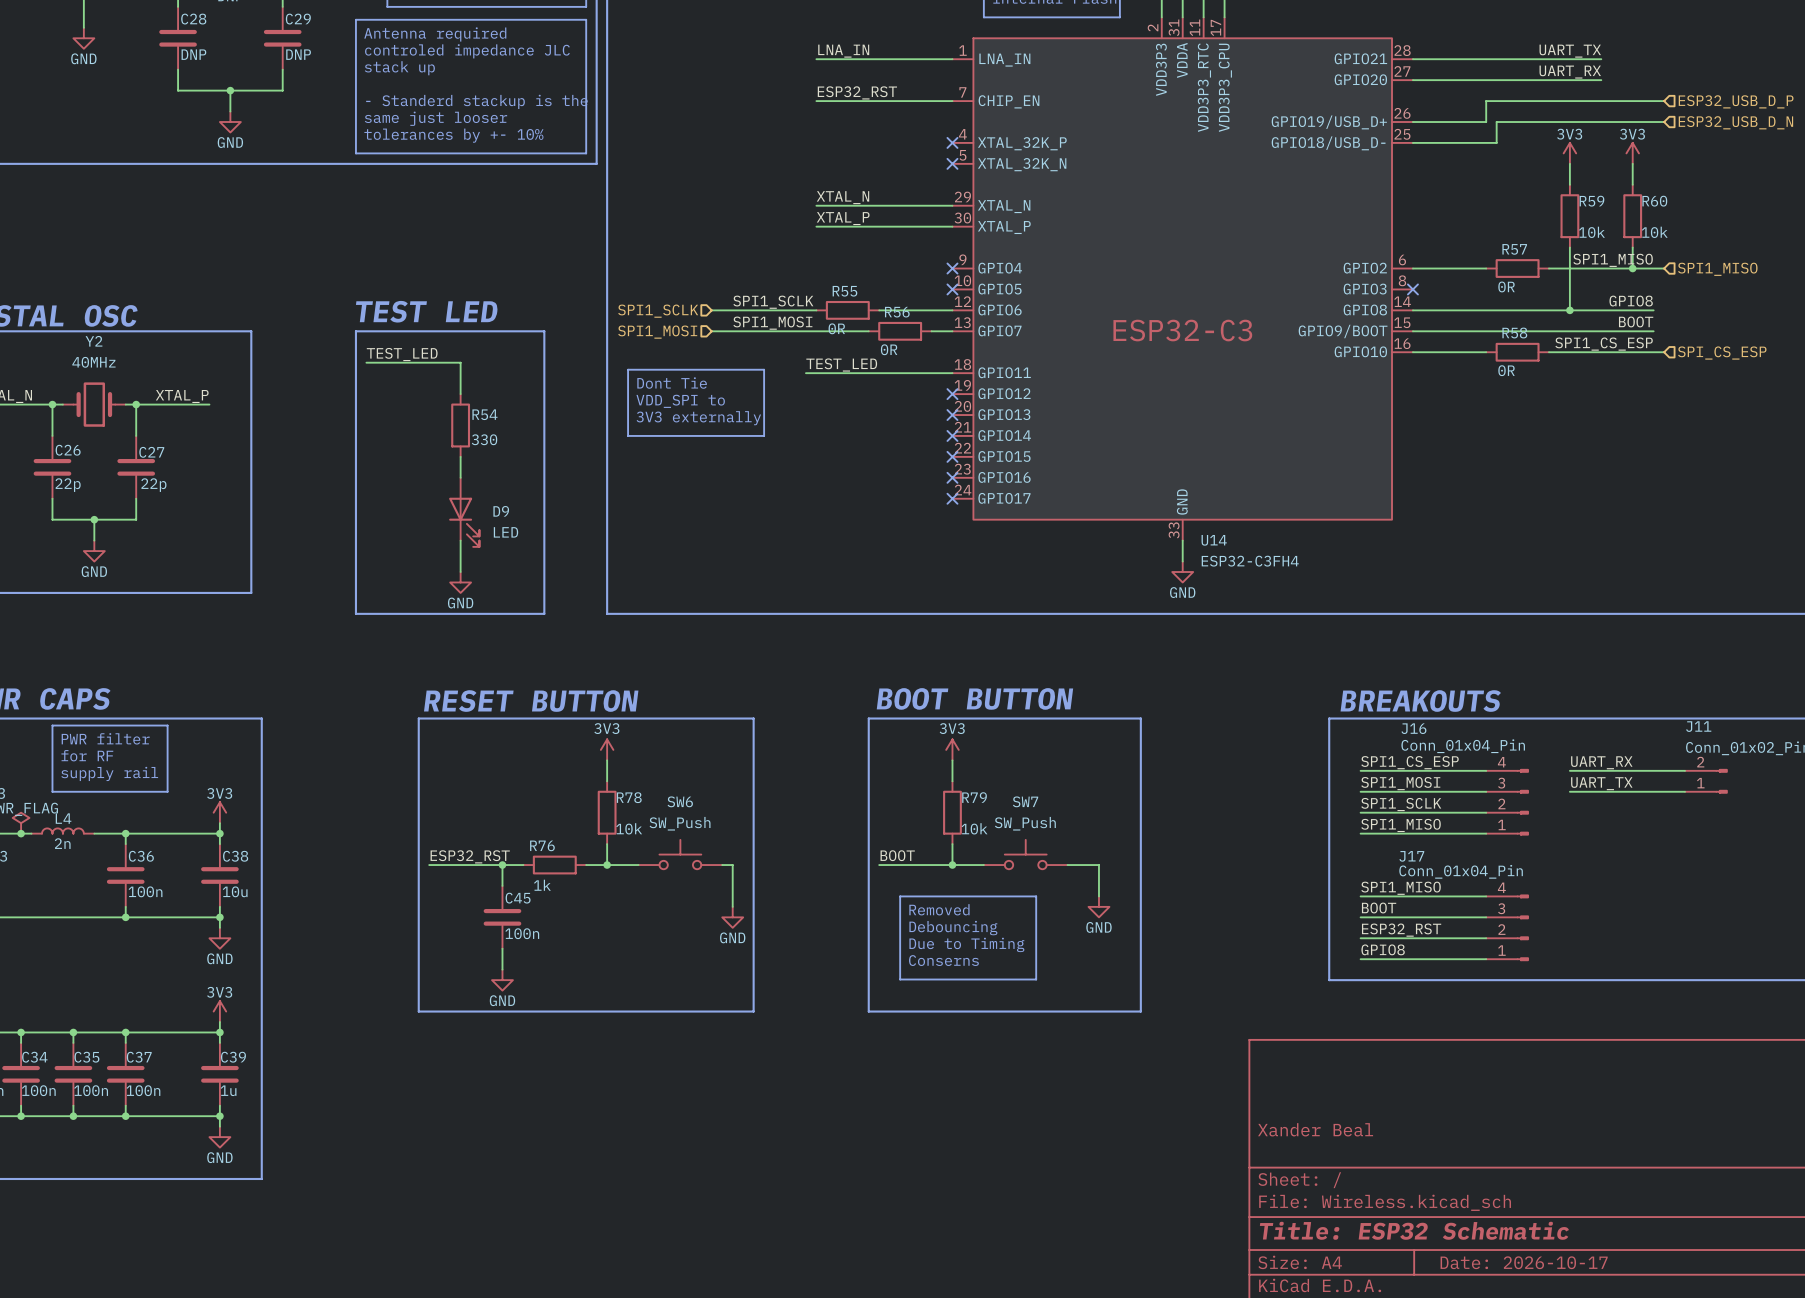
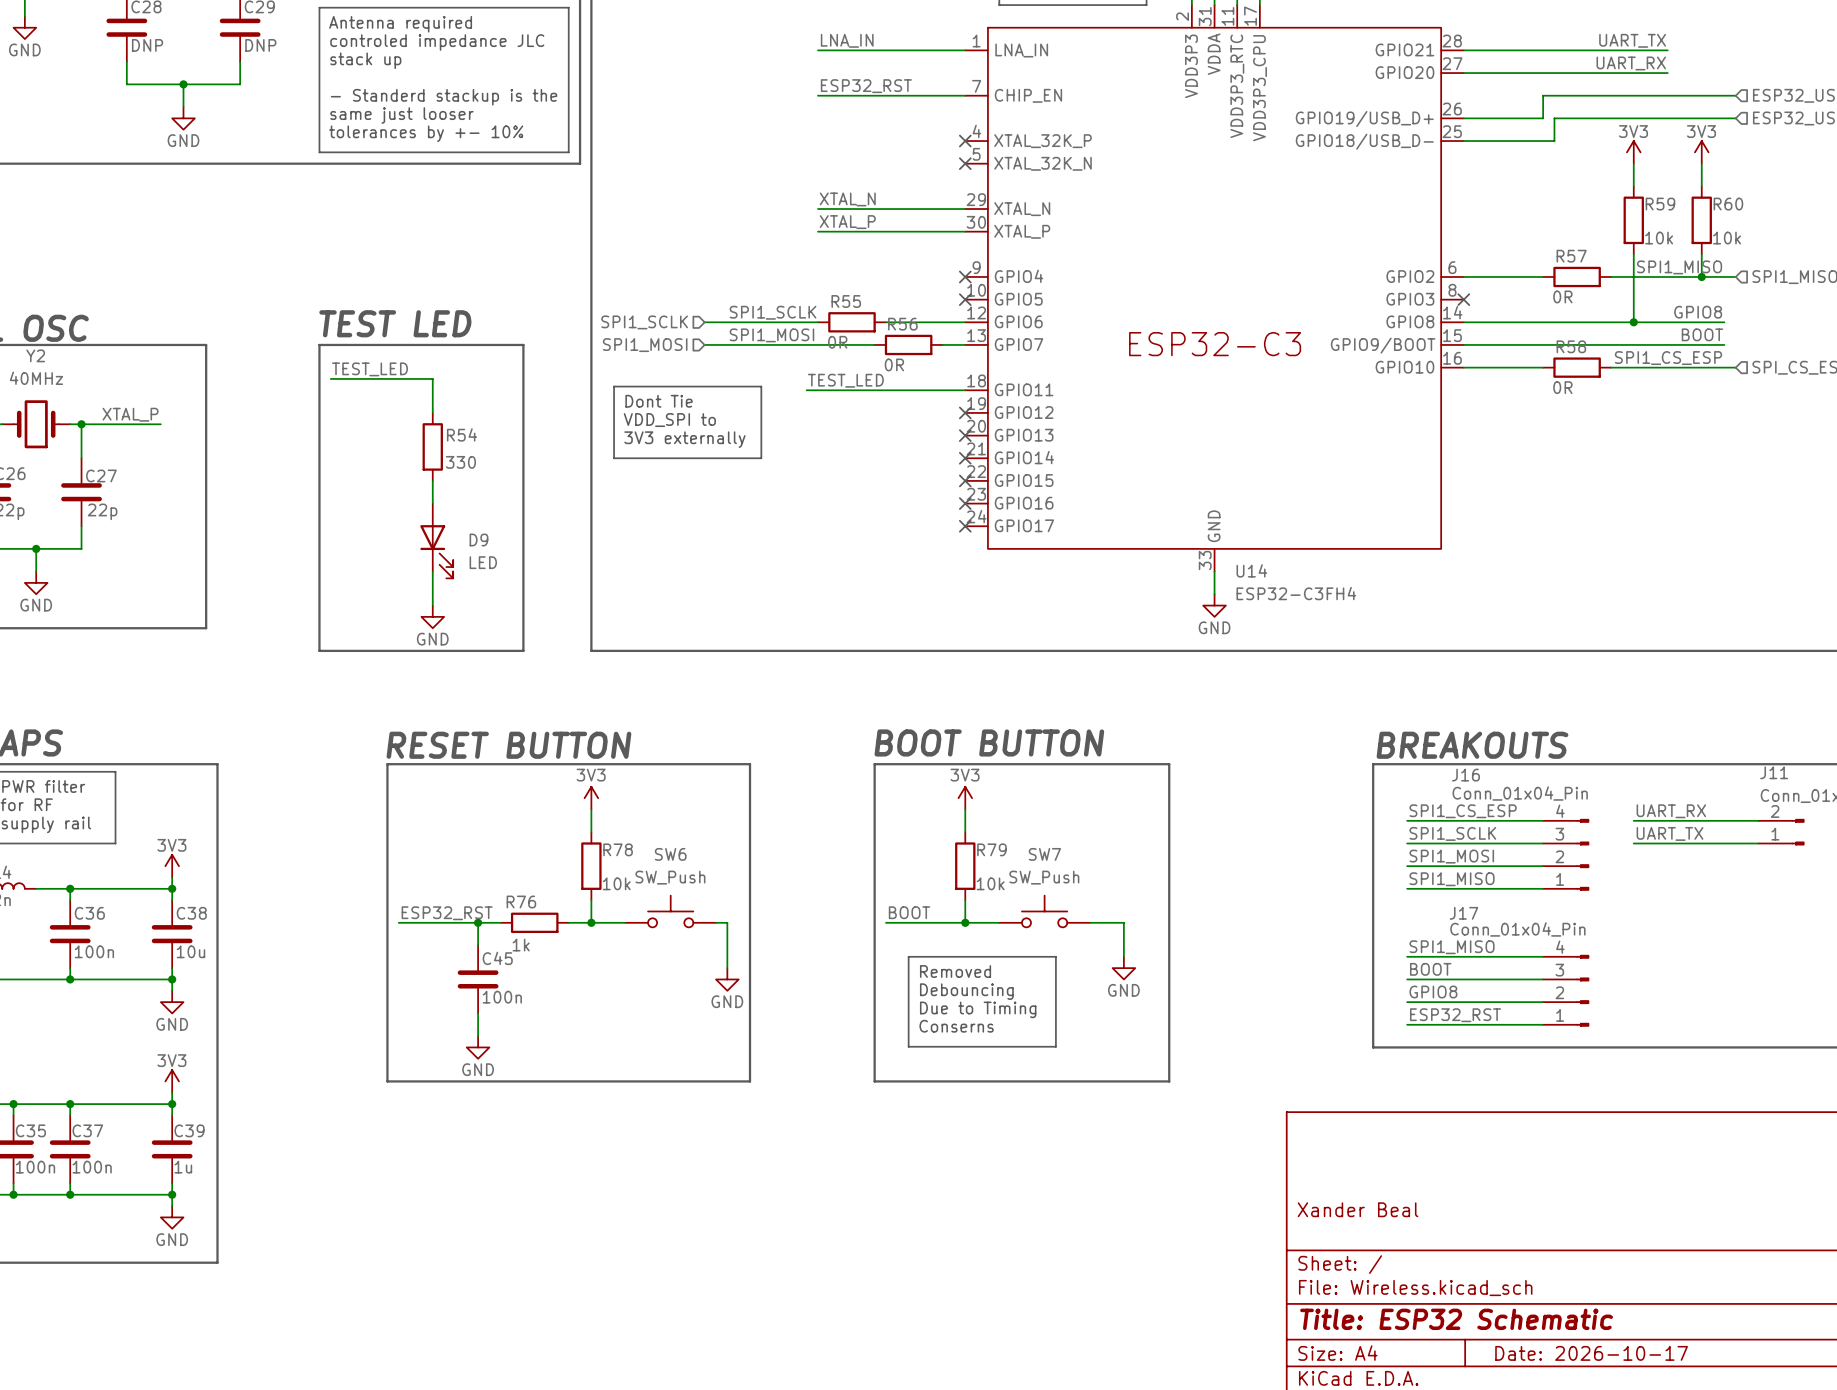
label: SPI1_MOSI (1400, 783) -> SPI1_SCLK (1452, 833)
label: SPI1_SCLK (1401, 804) -> SPI1_MOSI (1451, 856)
label: ESP32_RST (1401, 930) -> GPIO8 (1433, 992)
label: GPIO8 (1383, 949) -> ESP32_RST (1455, 1015)

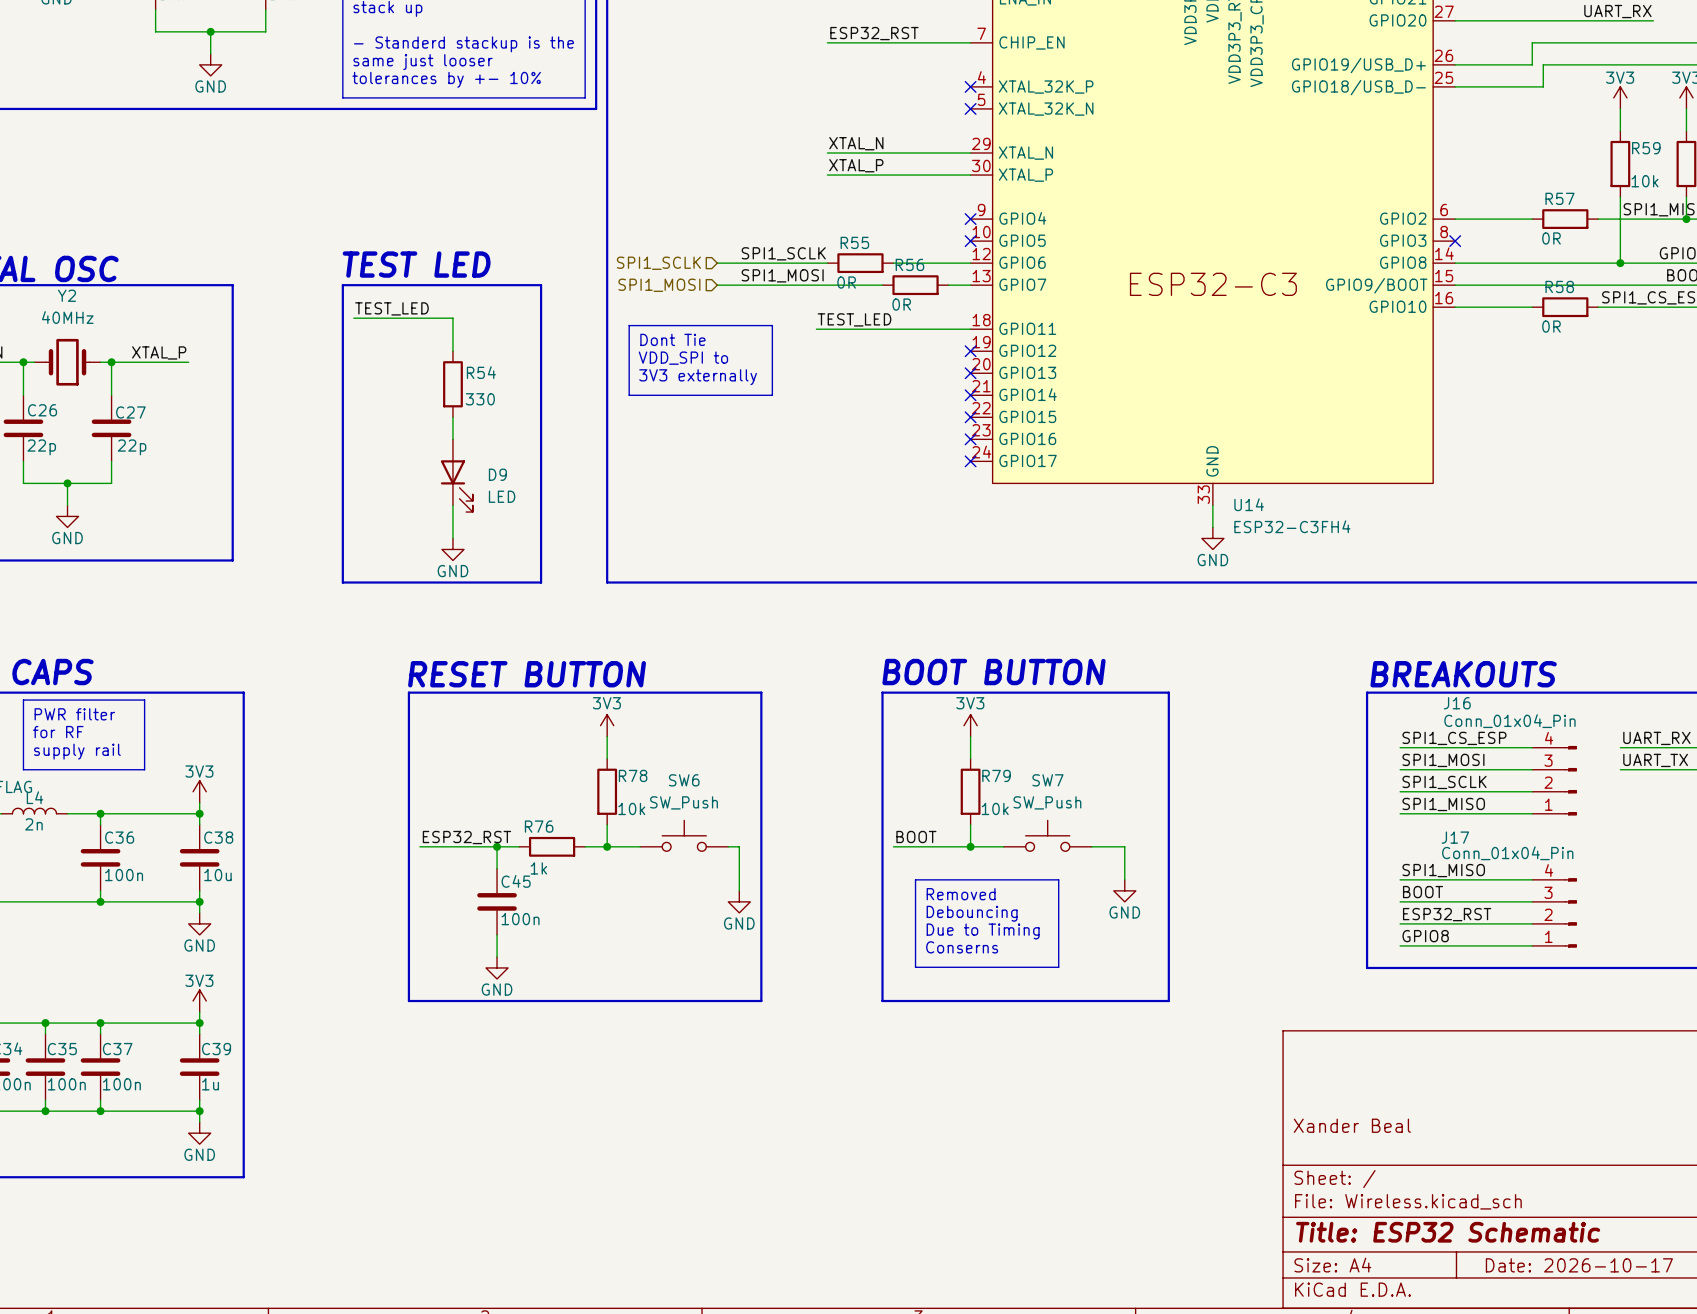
label: SPI1_SCLK (1452, 833) -> SPI1_MOSI (1443, 760)
label: SPI1_MOSI (1451, 856) -> SPI1_SCLK (1444, 782)
label: GPIO8 (1433, 992) -> ESP32_RST (1447, 914)
label: ESP32_RST (1455, 1015) -> GPIO8 (1425, 936)

